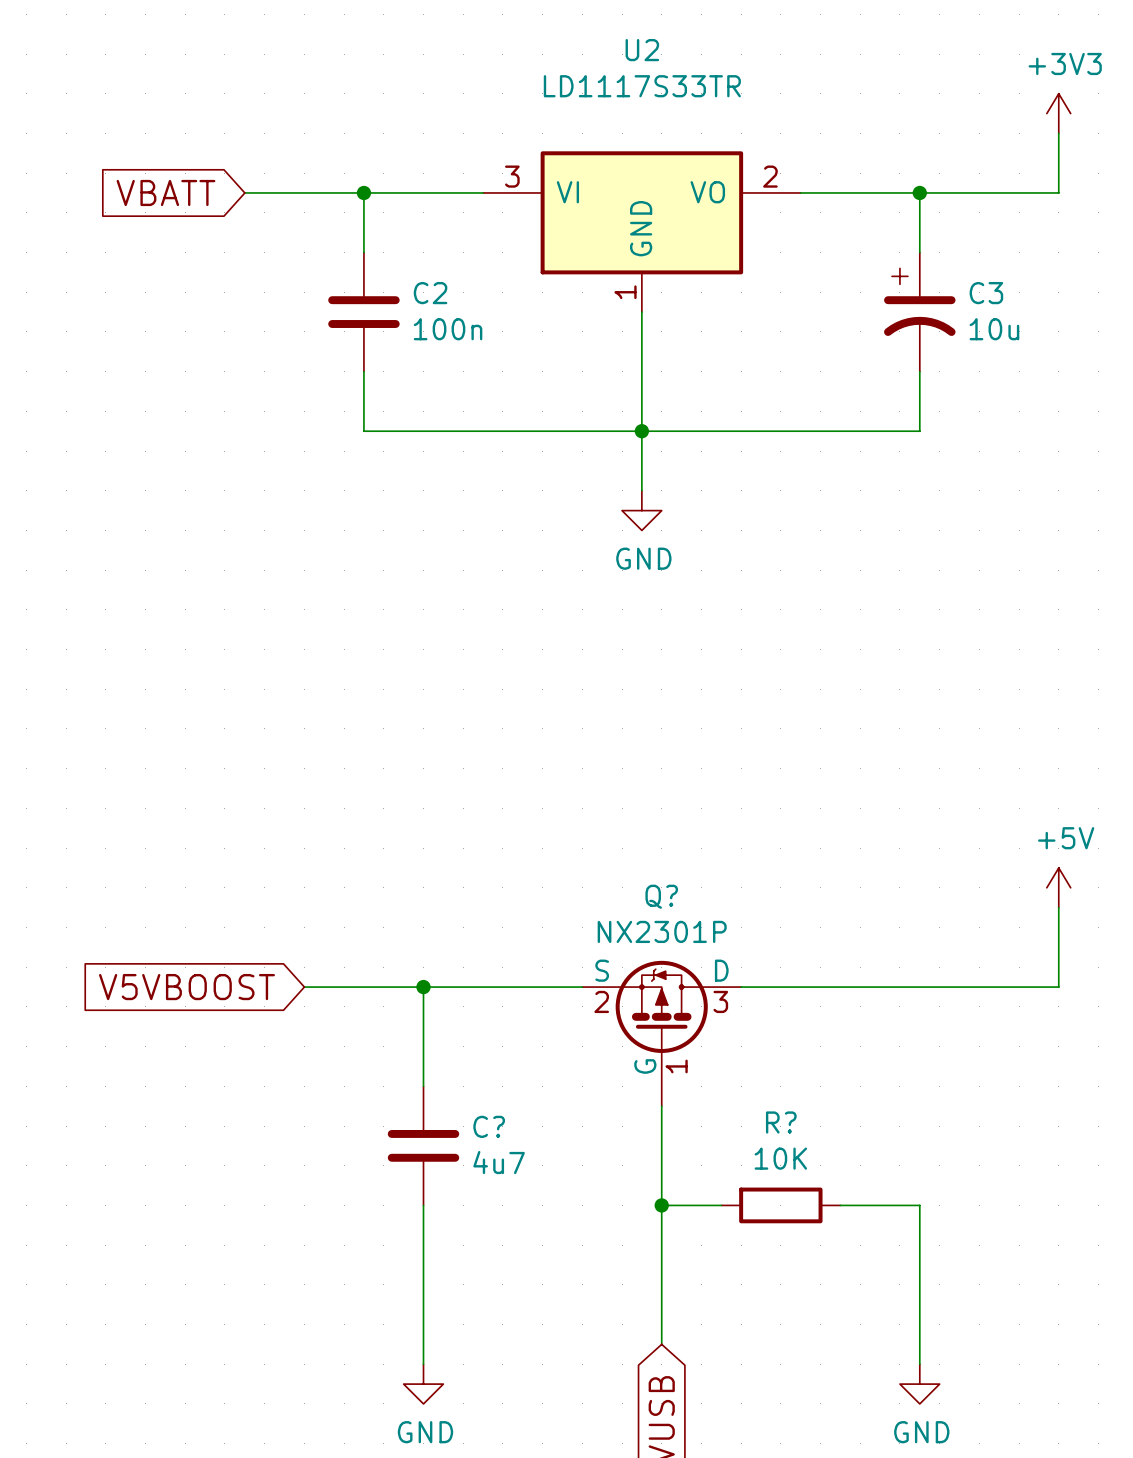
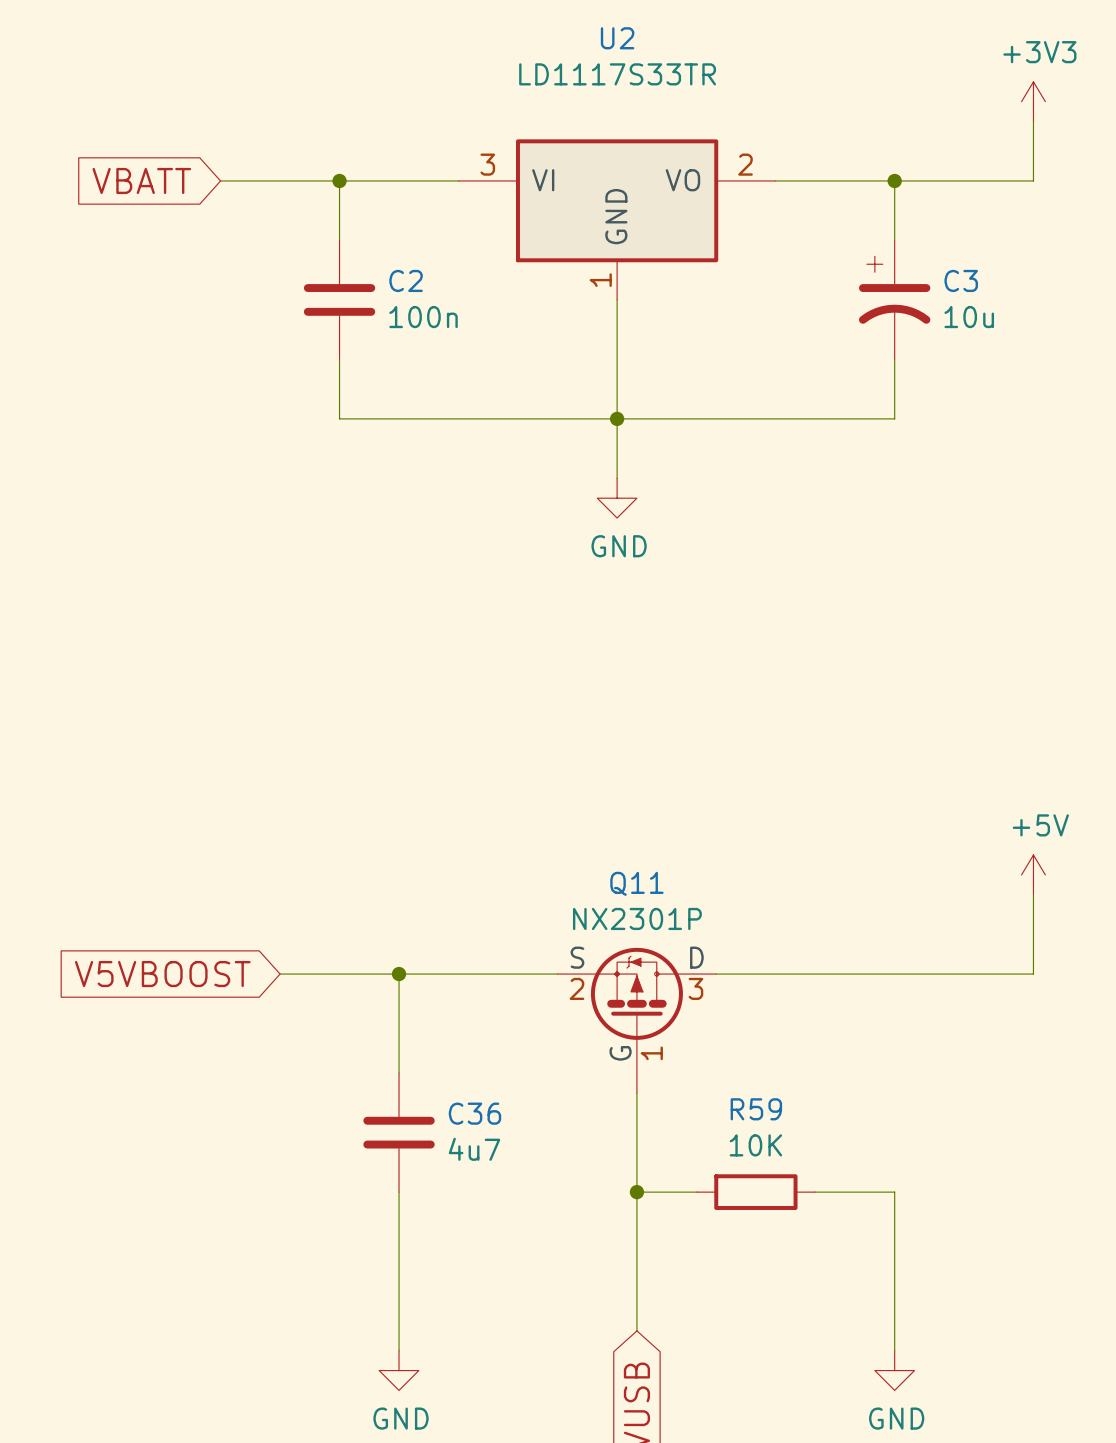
Q? name: Q? (661, 896) -> Q11 (636, 883)
R? name: R? (781, 1122) -> R59 (756, 1109)
C? name: C? (489, 1126) -> C36 (474, 1113)

